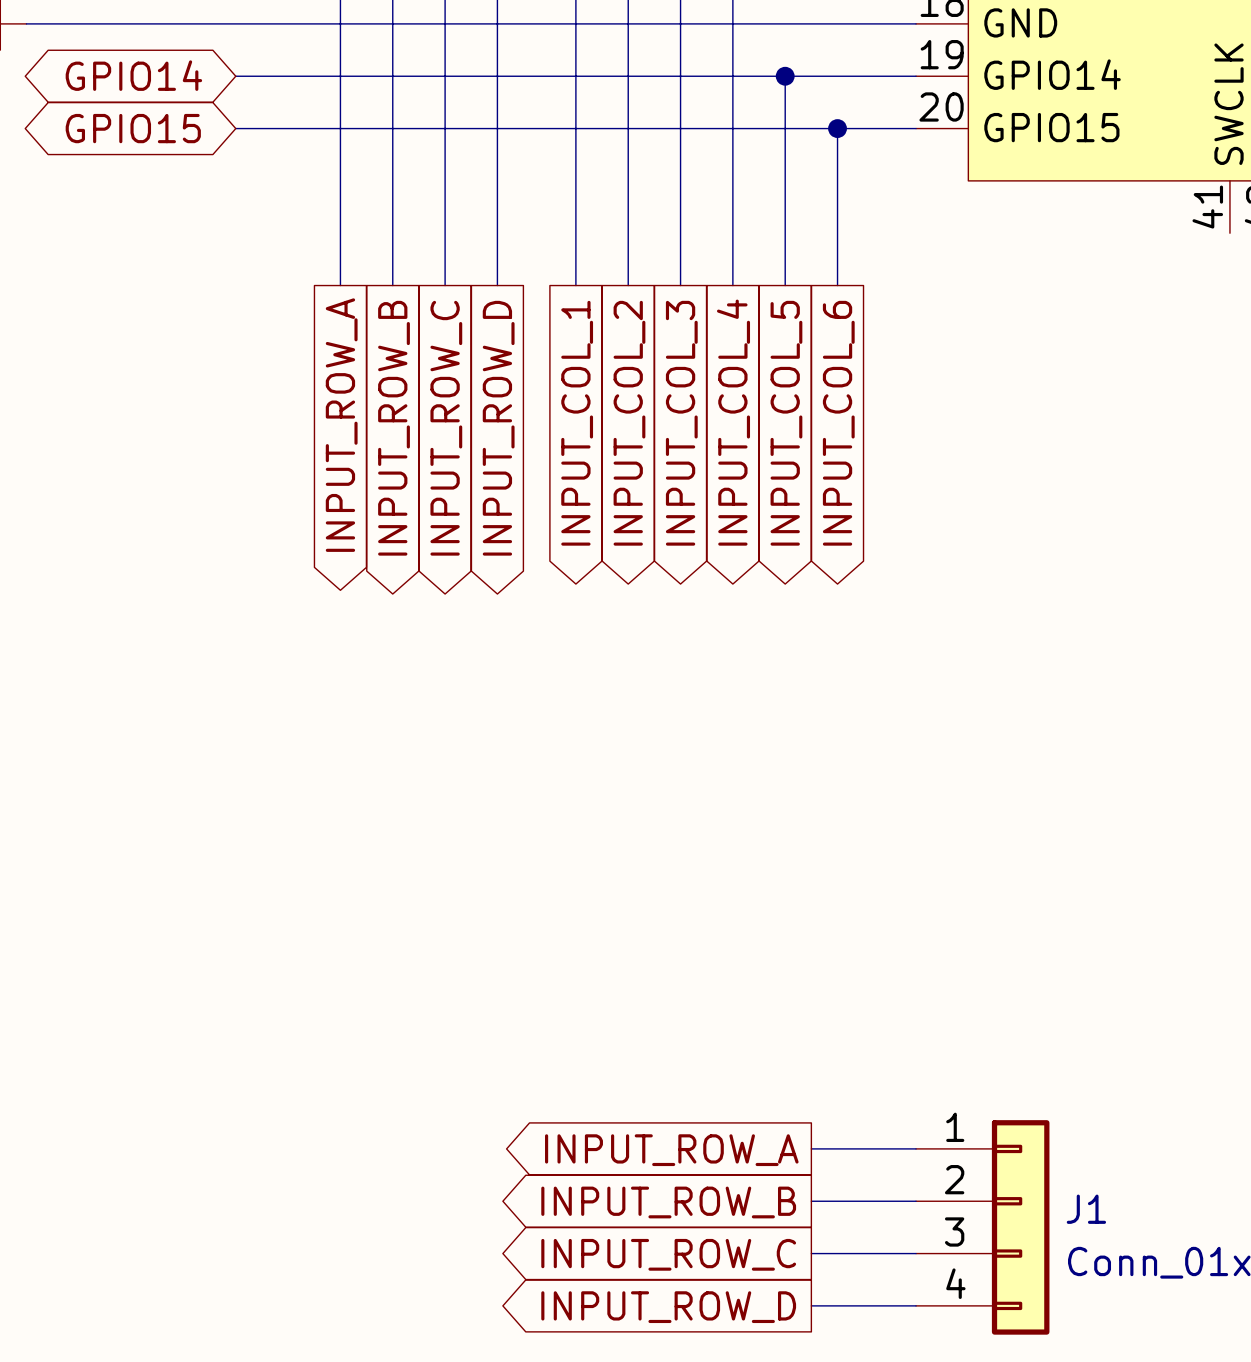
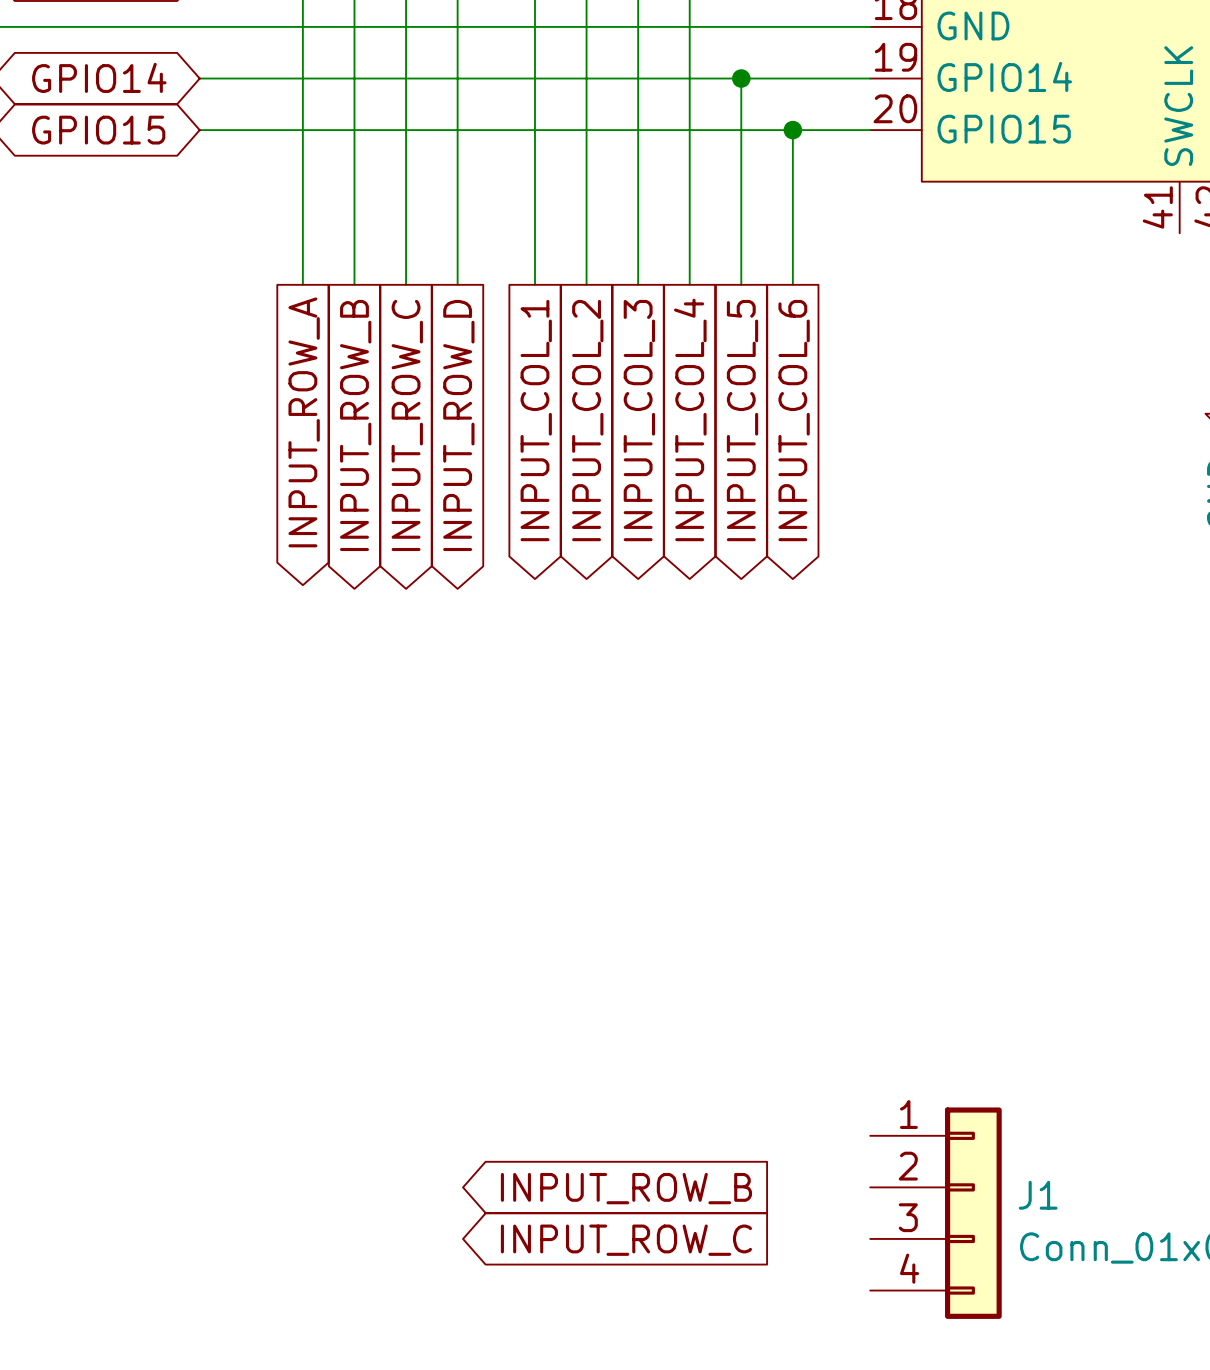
wire: (811, 1148) (916, 1148) -> none
global label: INPUT_ROW_A (671, 1150) -> none
wire: (811, 1201) (916, 1201) -> none
wire: (811, 1253) (916, 1253) -> none
wire: (811, 1305) (916, 1305) -> none
global label: INPUT_ROW_D (668, 1307) -> none

